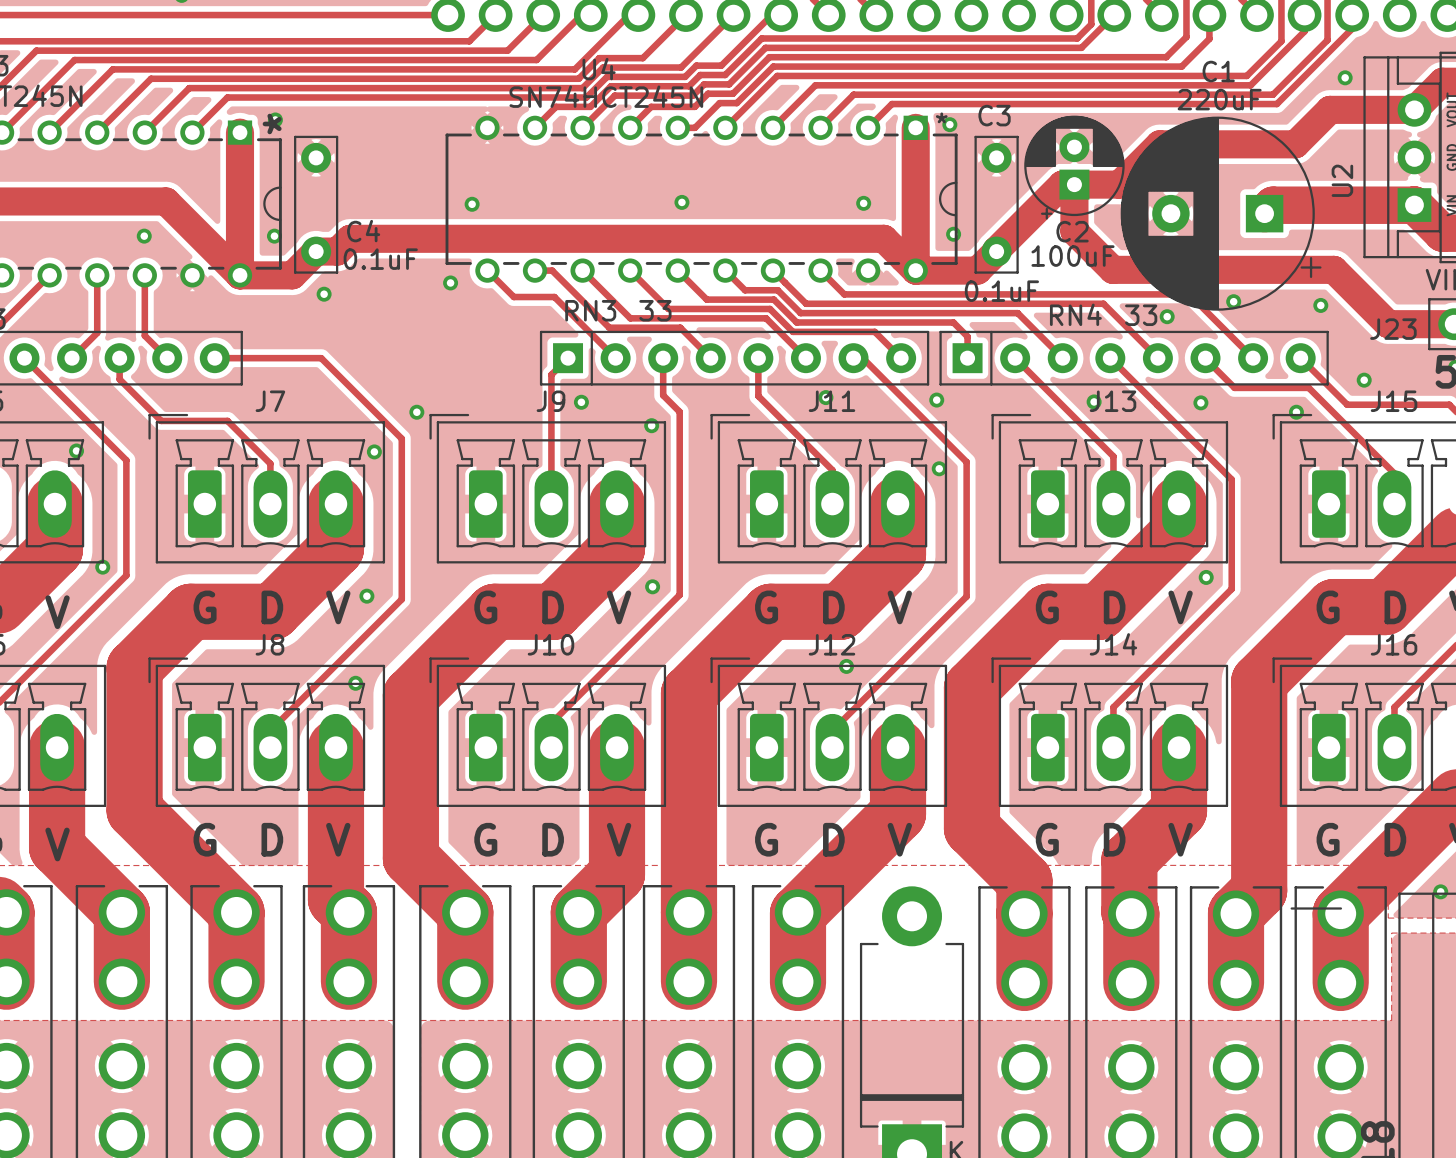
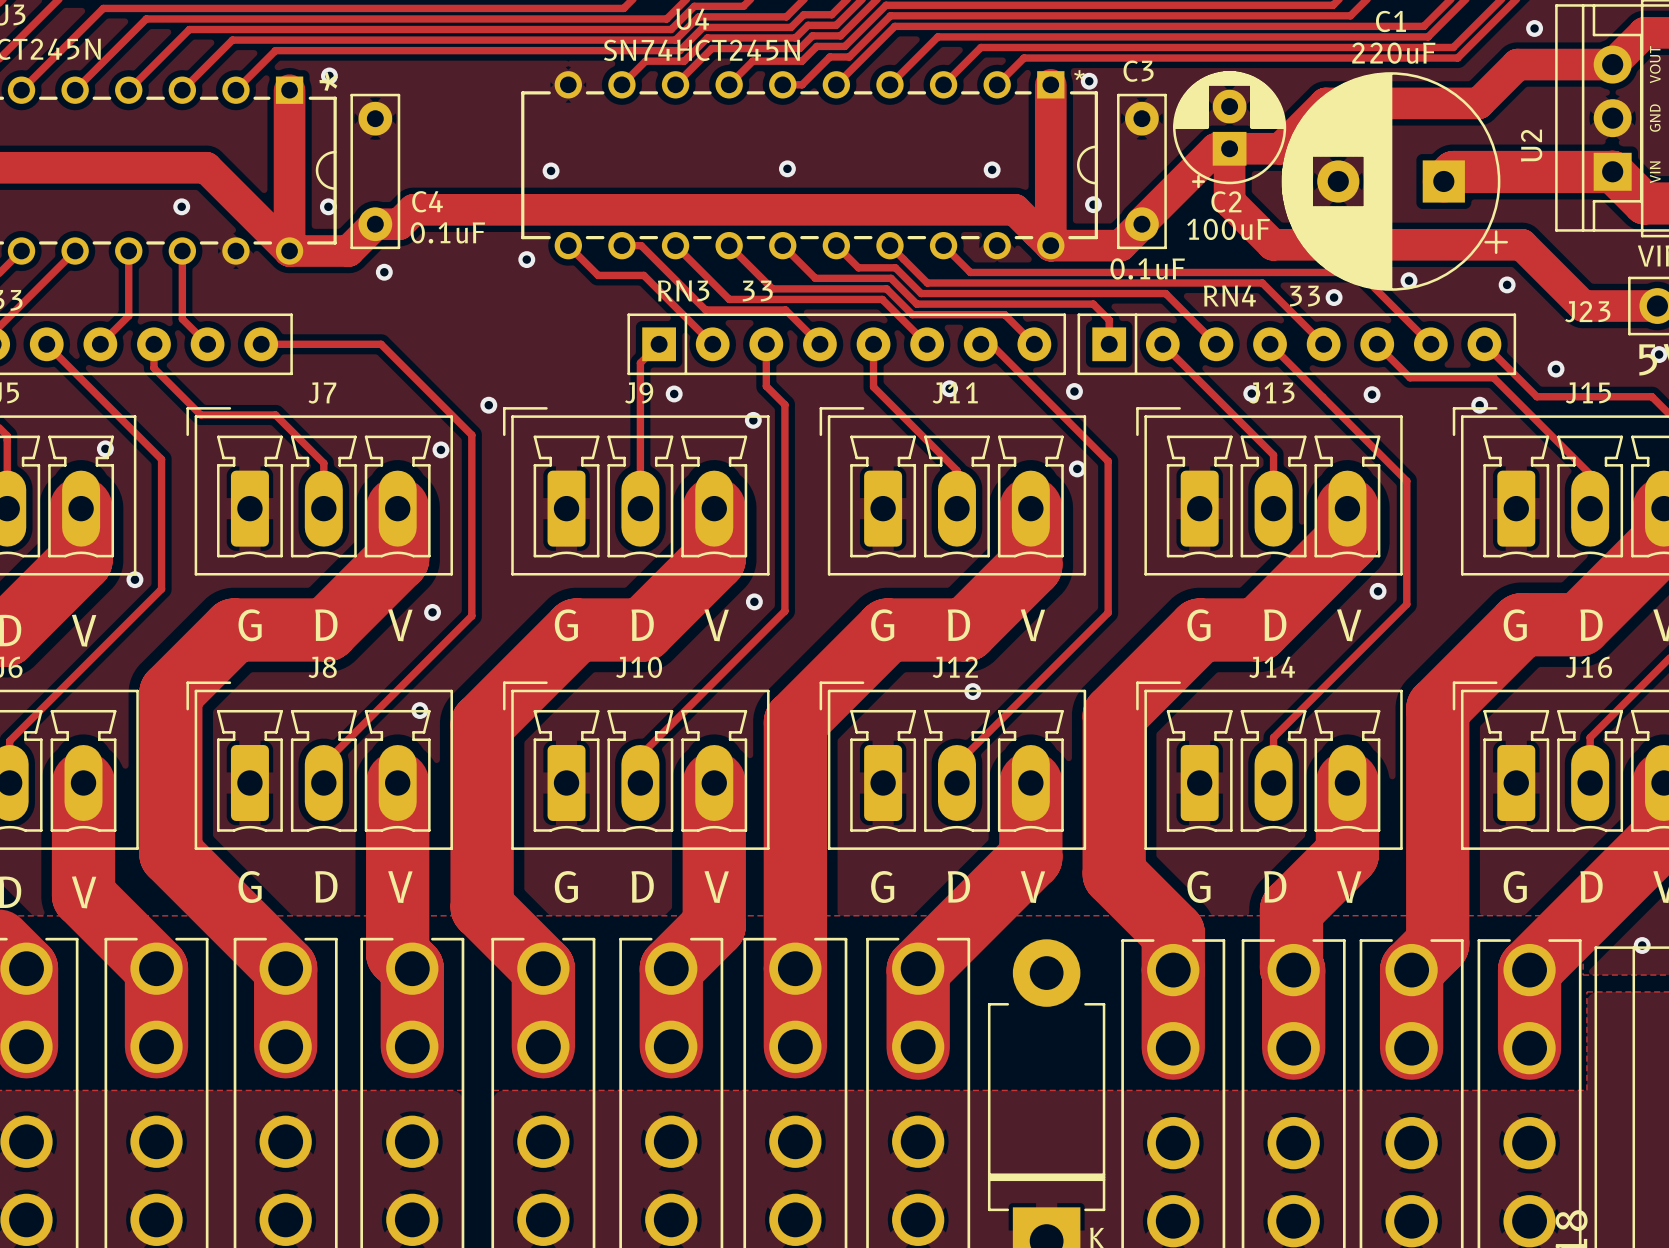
line: (1291, 908) (1340, 908) -> none

